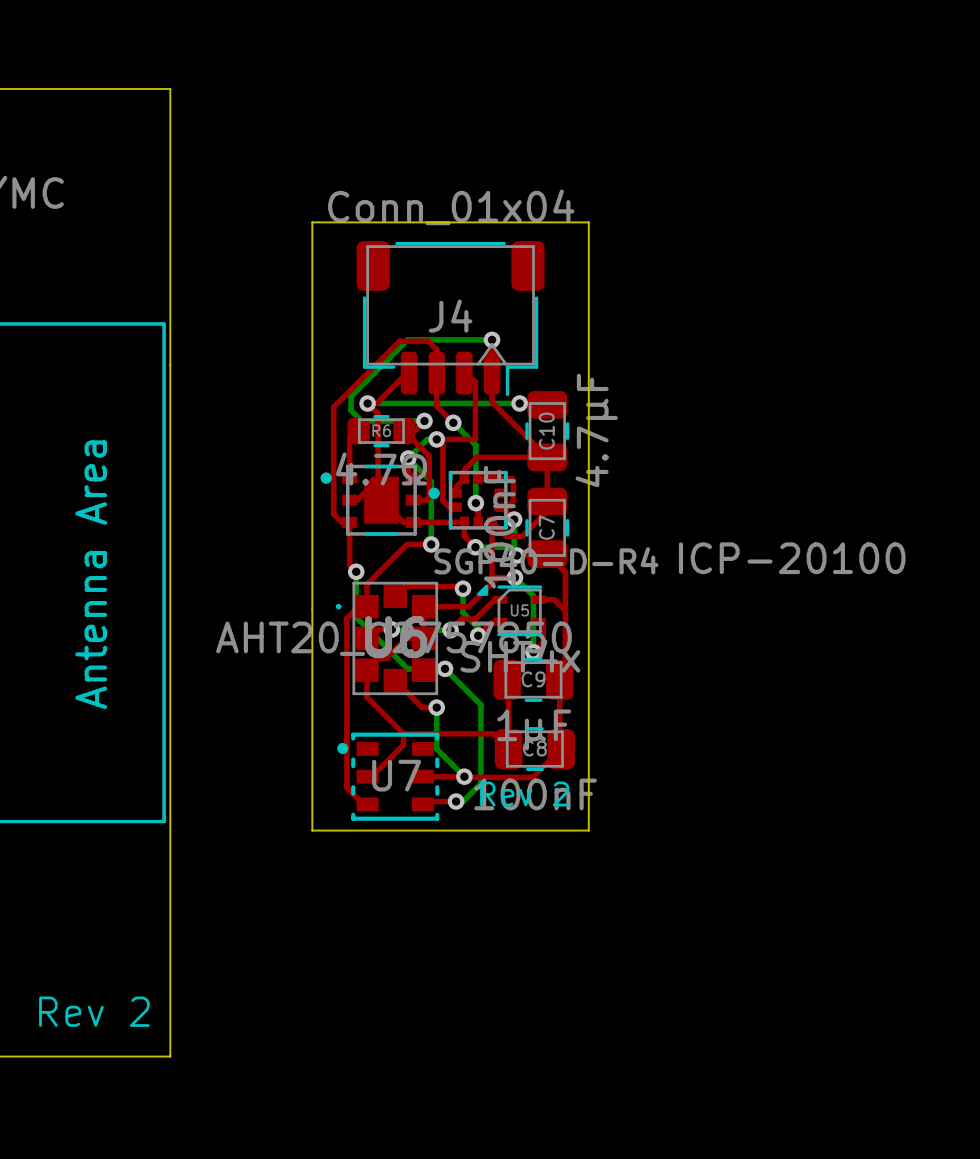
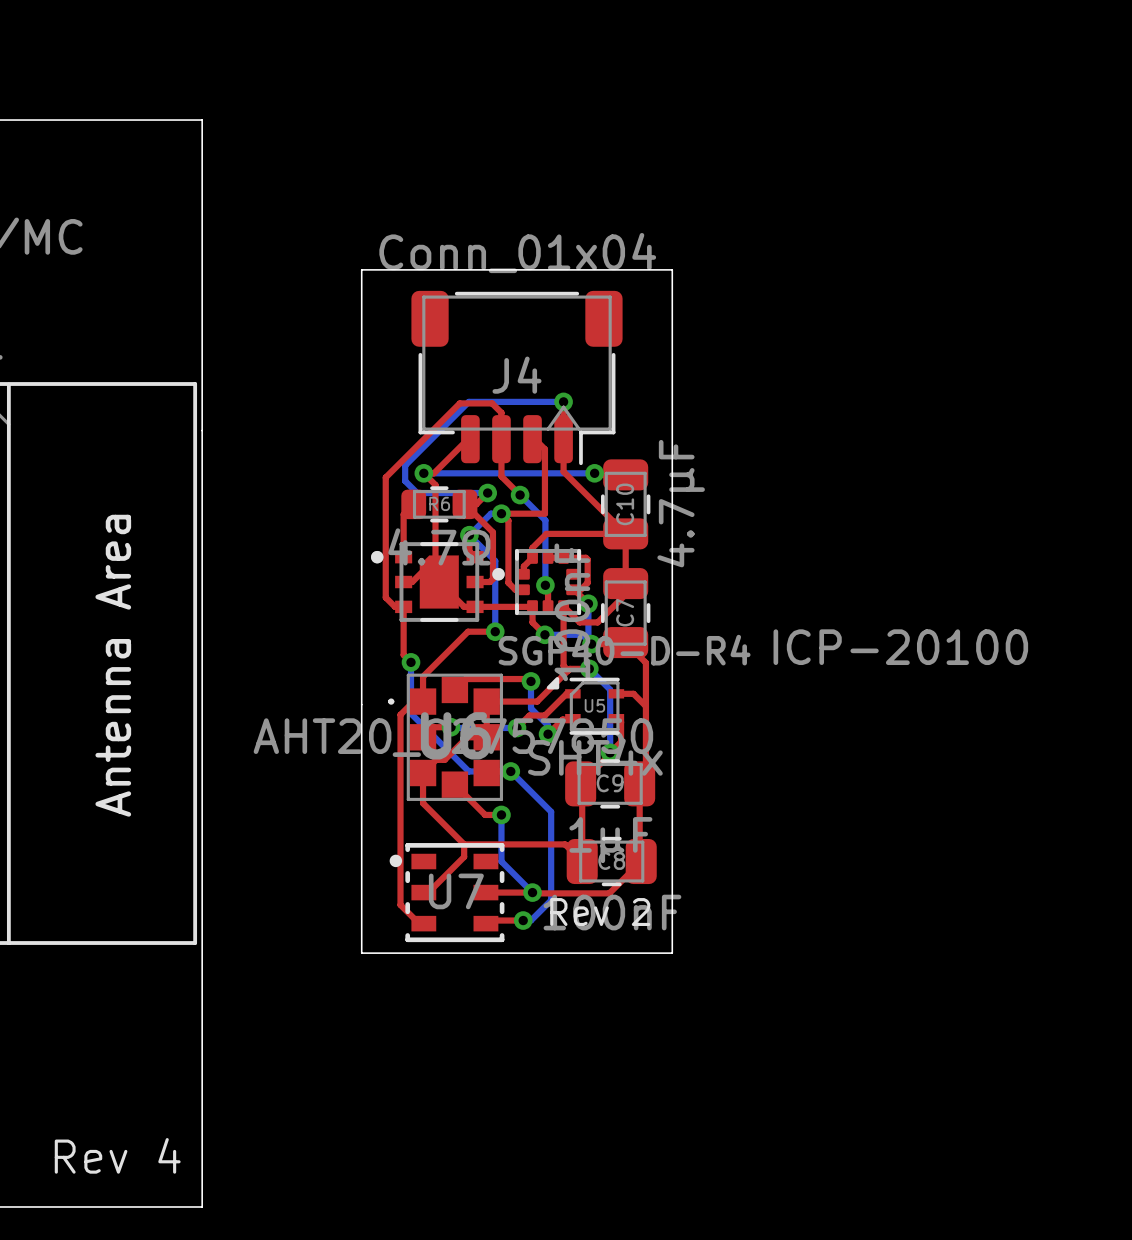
text: Rev 2 (94, 1011) -> Rev 4 (117, 1155)

